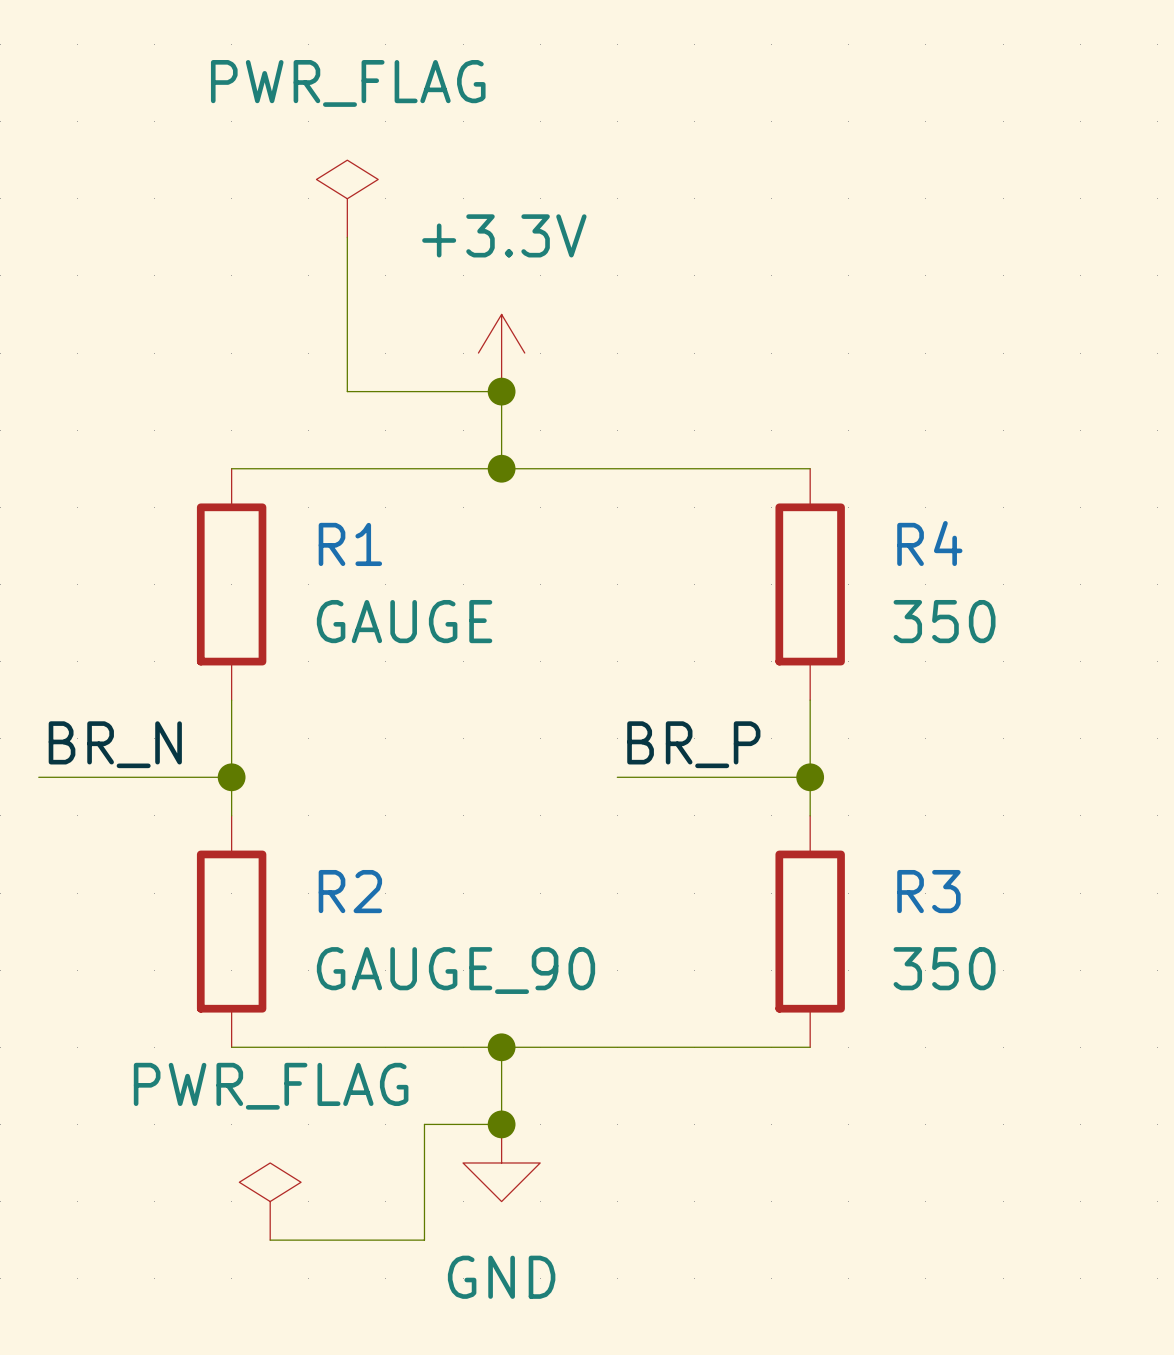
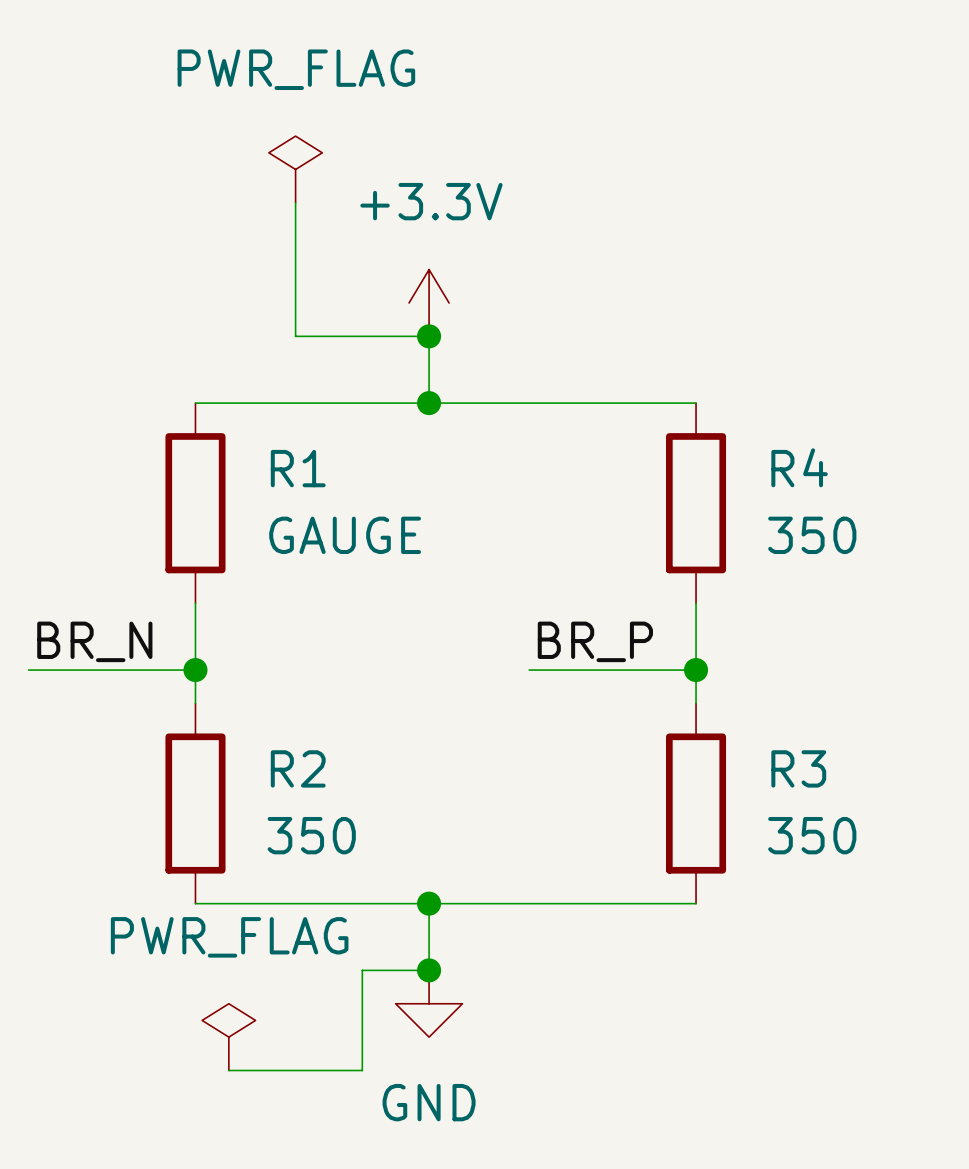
R2 value: GAUGE_90 (455, 970) -> 350 (311, 835)

